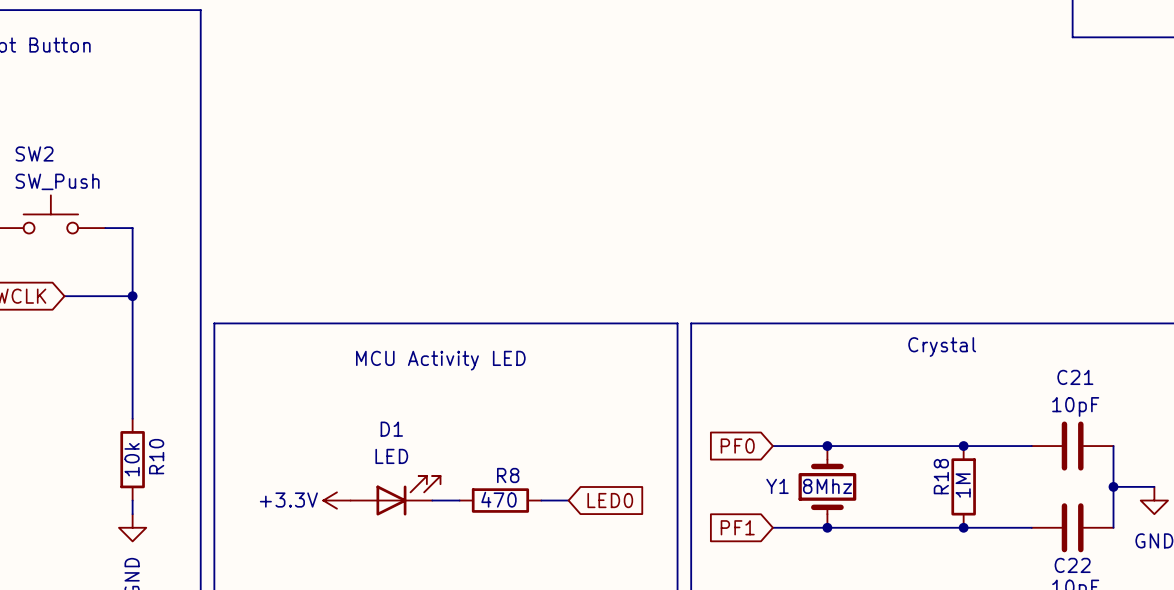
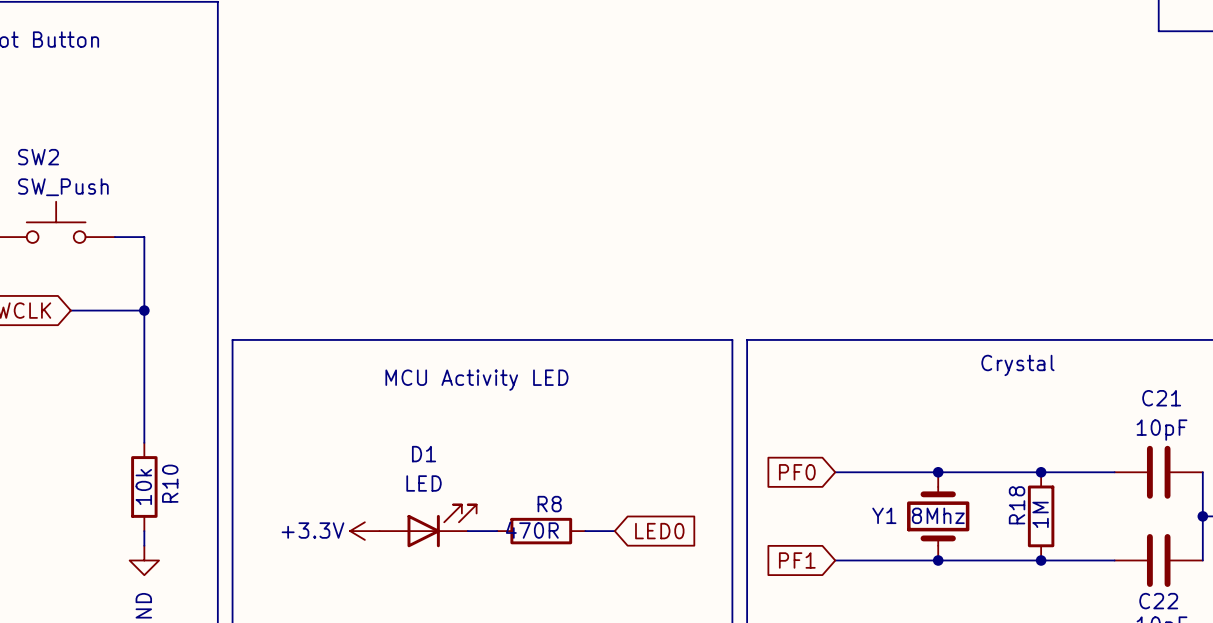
junction position: (827, 446) -> (938, 472)
Y1 position: (827, 486) -> (938, 516)
R8 value: 470 (498, 499) -> 470R (532, 530)
junction position: (827, 527) -> (938, 560)

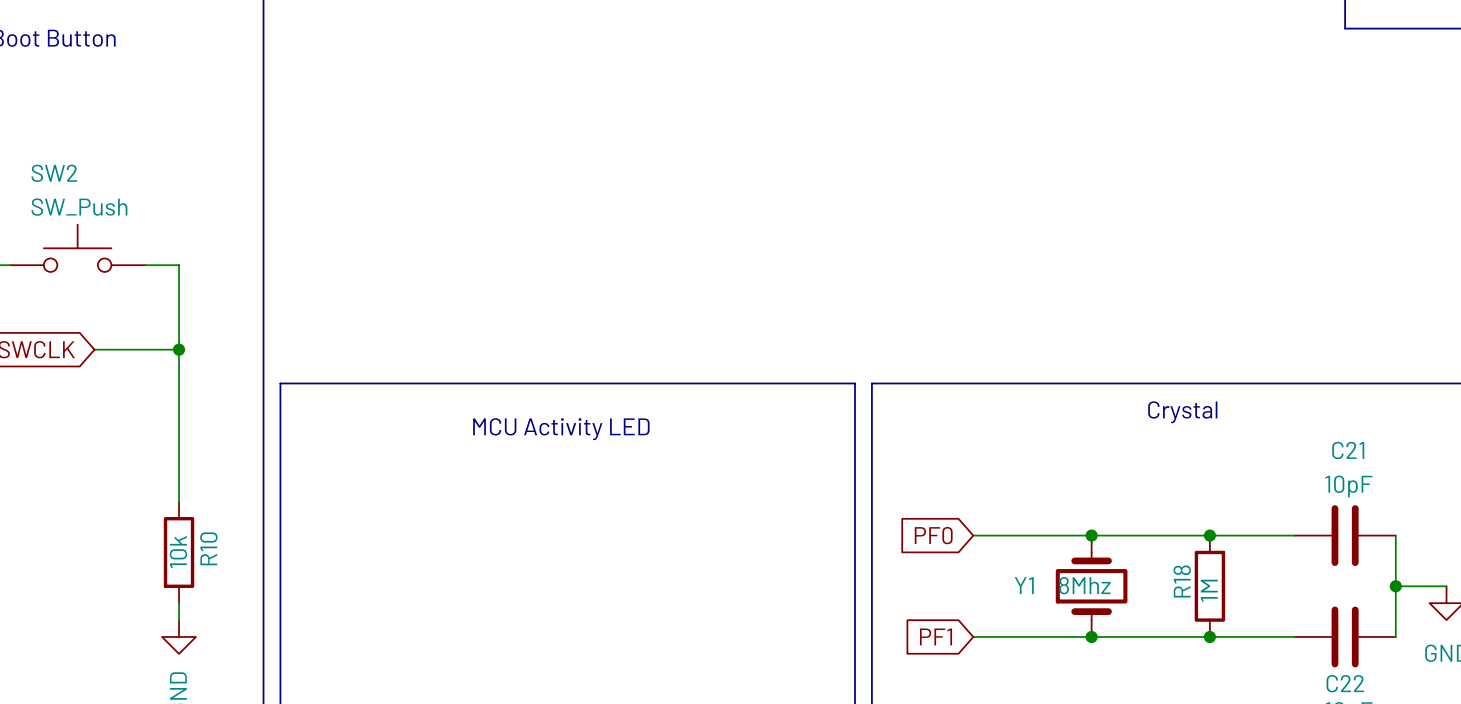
D1: LED (428, 525) -> none
power symbol: +3.3V (364, 531) -> none
wire: (467, 531) (497, 531) -> none
R8: 470R (541, 531) -> none
wire: (585, 531) (614, 531) -> none
global label: LED0 (659, 531) -> none

